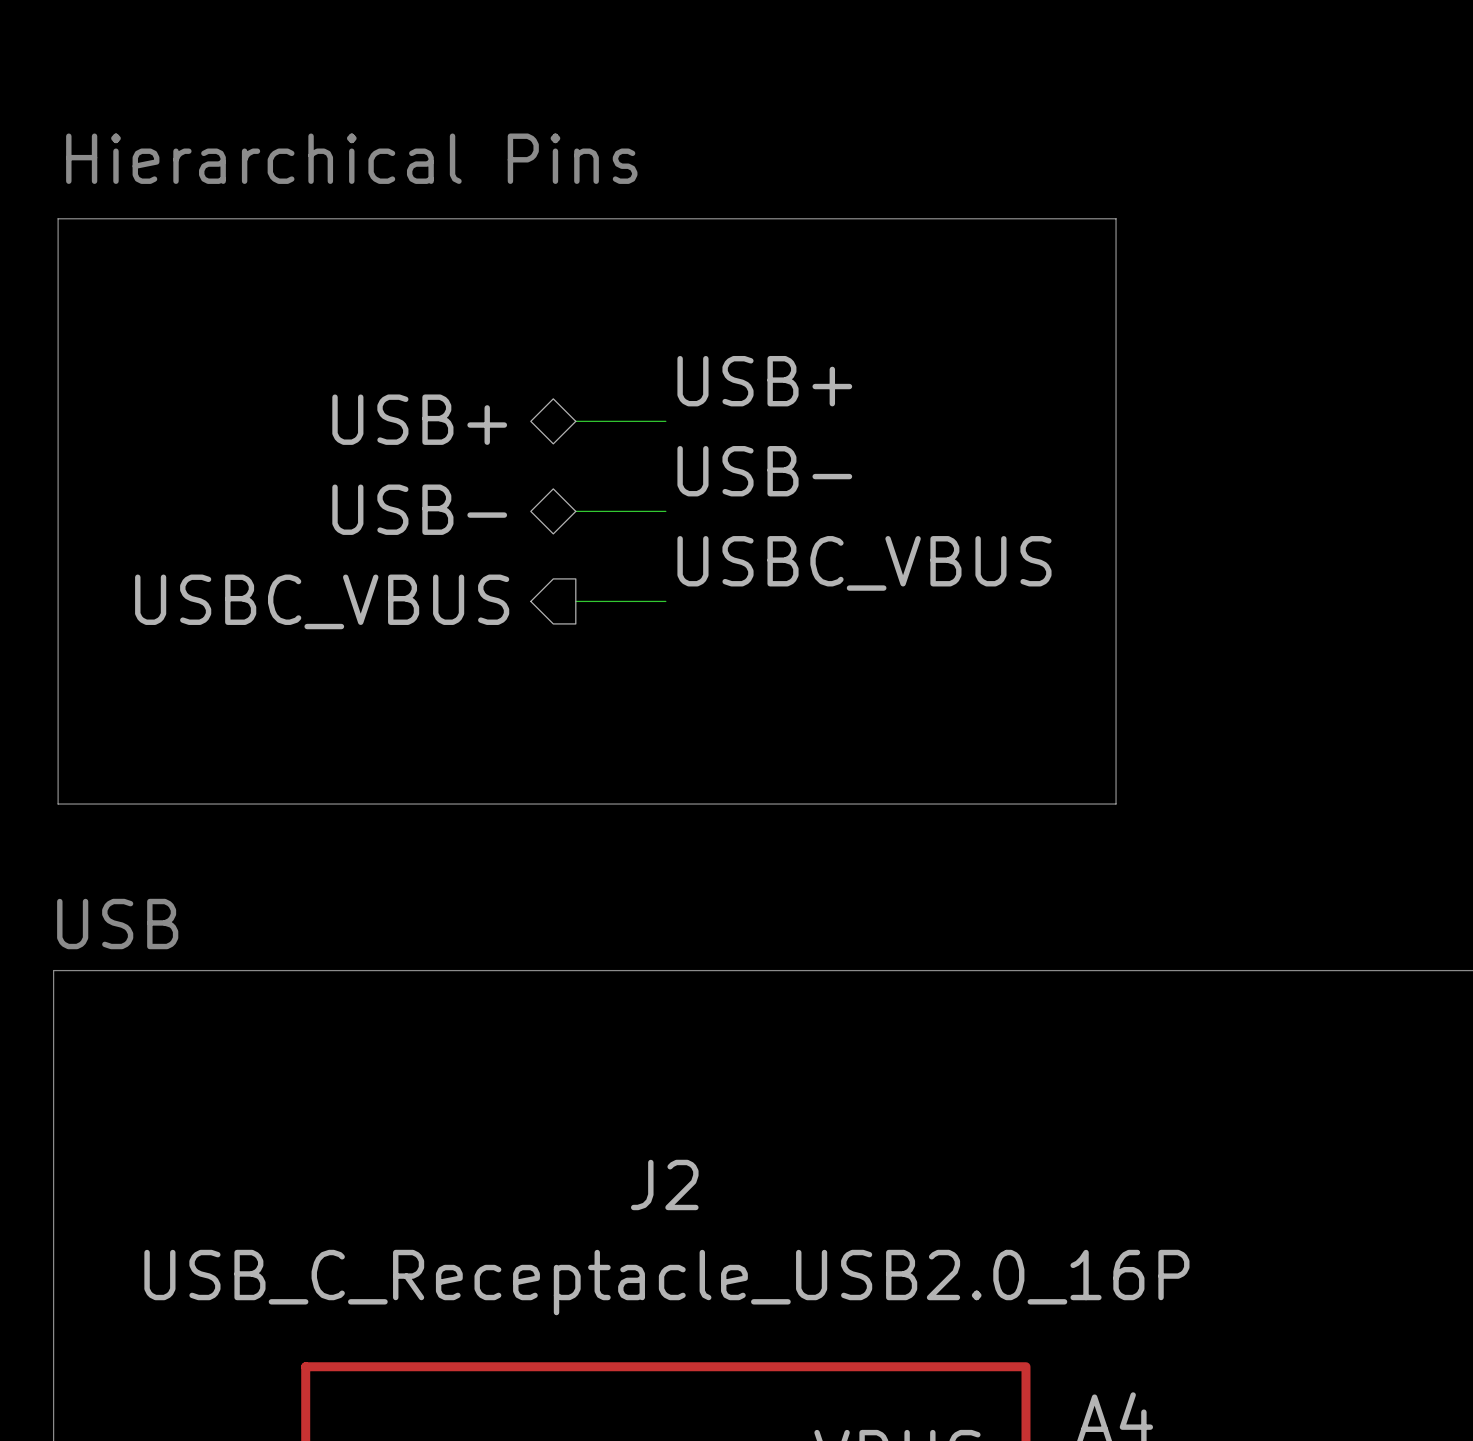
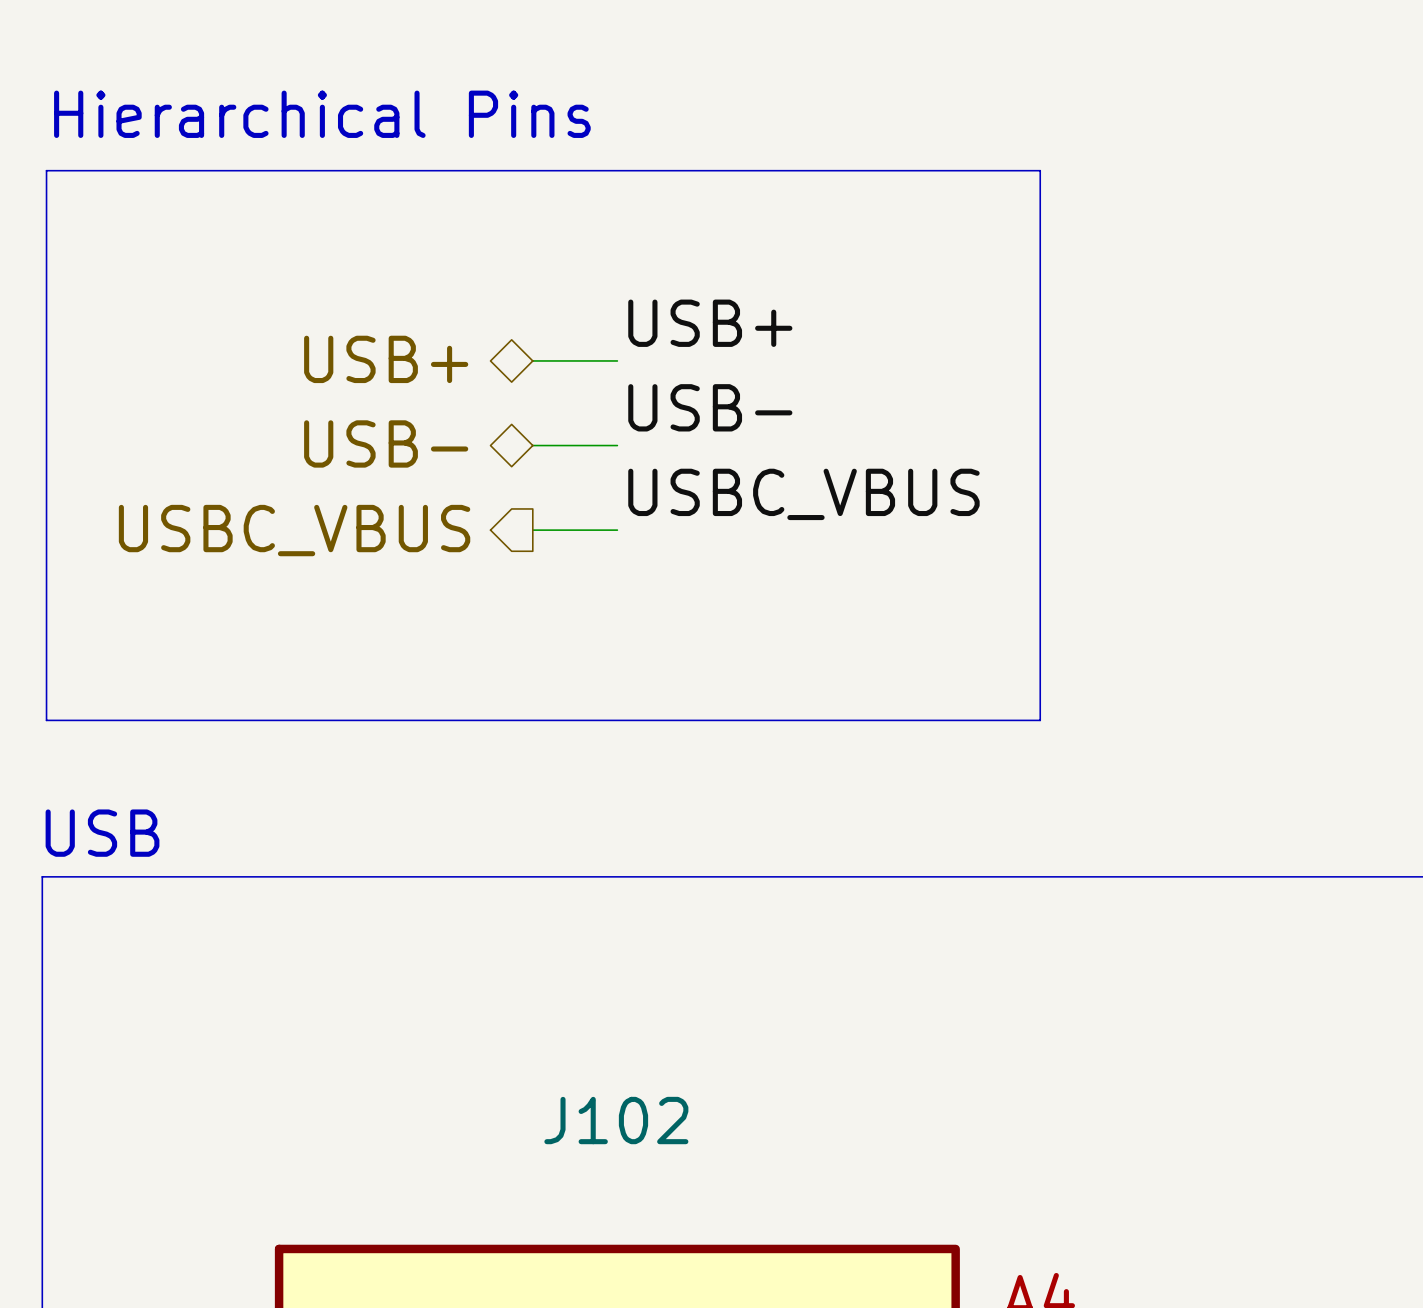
J2 name: J2 (664, 1184) -> J102 (616, 1120)
J2 value: USB_C_Receptacle_USB2.0_16P (666, 1282) -> none

